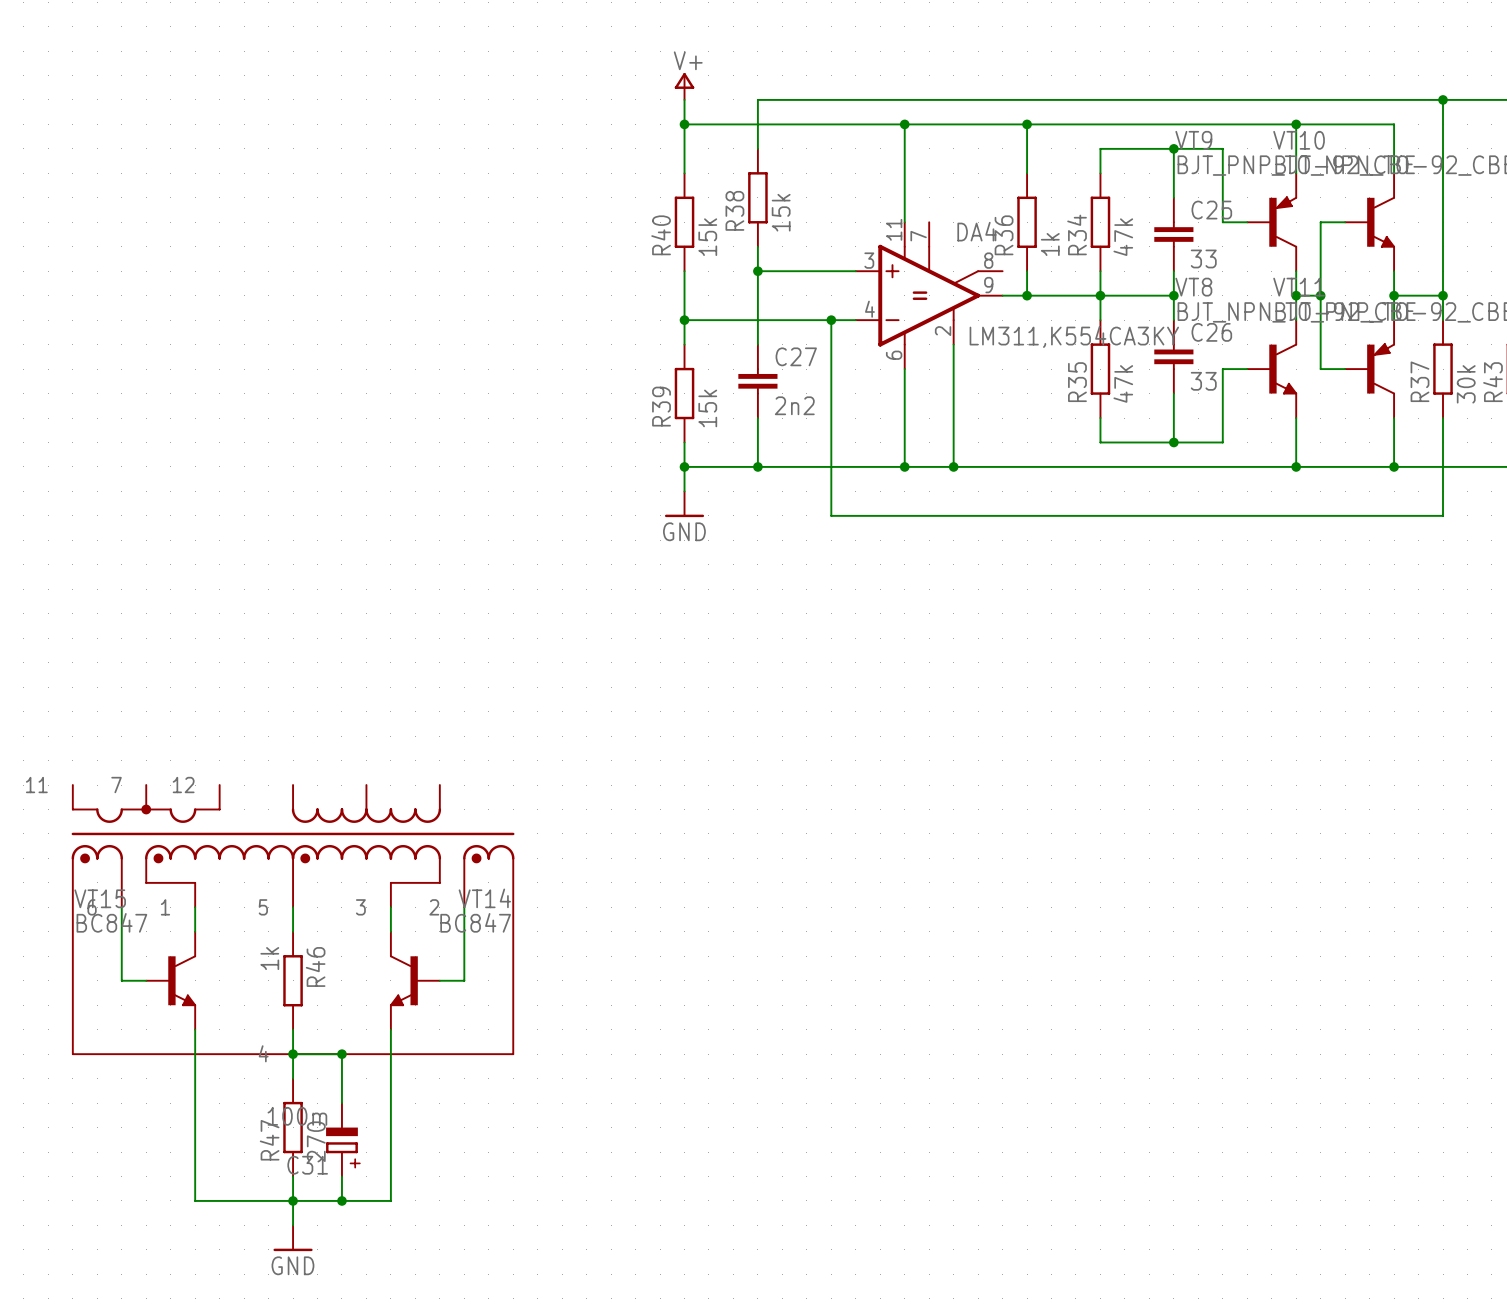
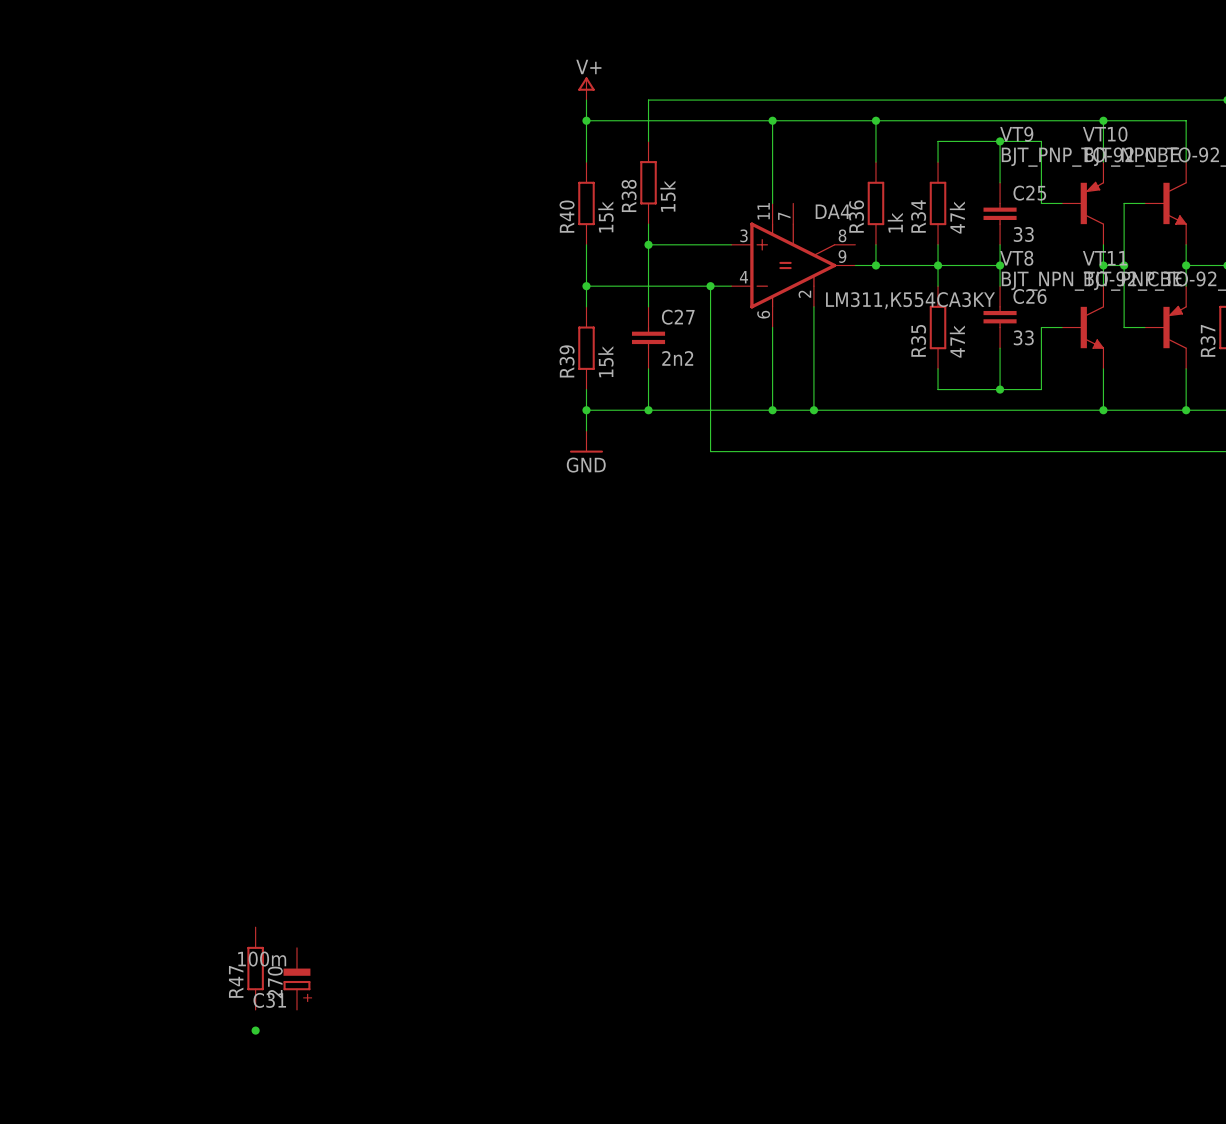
wire: (121, 907) (121, 980) (146, 980) -> none
wire: (195, 907) (195, 931) -> none
wire: (293, 907) (293, 931) -> none
wire: (390, 907) (390, 931) -> none
wire: (464, 907) (464, 980) (439, 980) -> none
part: (293, 919) -> none
VT15: BC847 (171, 980) -> none
R46: 1k (293, 980) -> none
VT14: BC847 (415, 980) -> none
wire: (195, 1029) (195, 1200) (390, 1200) (390, 1029) -> none
wire: (293, 1029) (293, 1078) -> none
wire: (293, 1054) (341, 1054) (341, 1103) -> none
junction: (293, 1054) -> none
junction: (341, 1054) -> none
wire: (293, 1176) (293, 1225) -> none
wire: (341, 1176) (341, 1200) -> none
junction: (341, 1200) -> none
power symbol: GND (293, 1238) -> none

